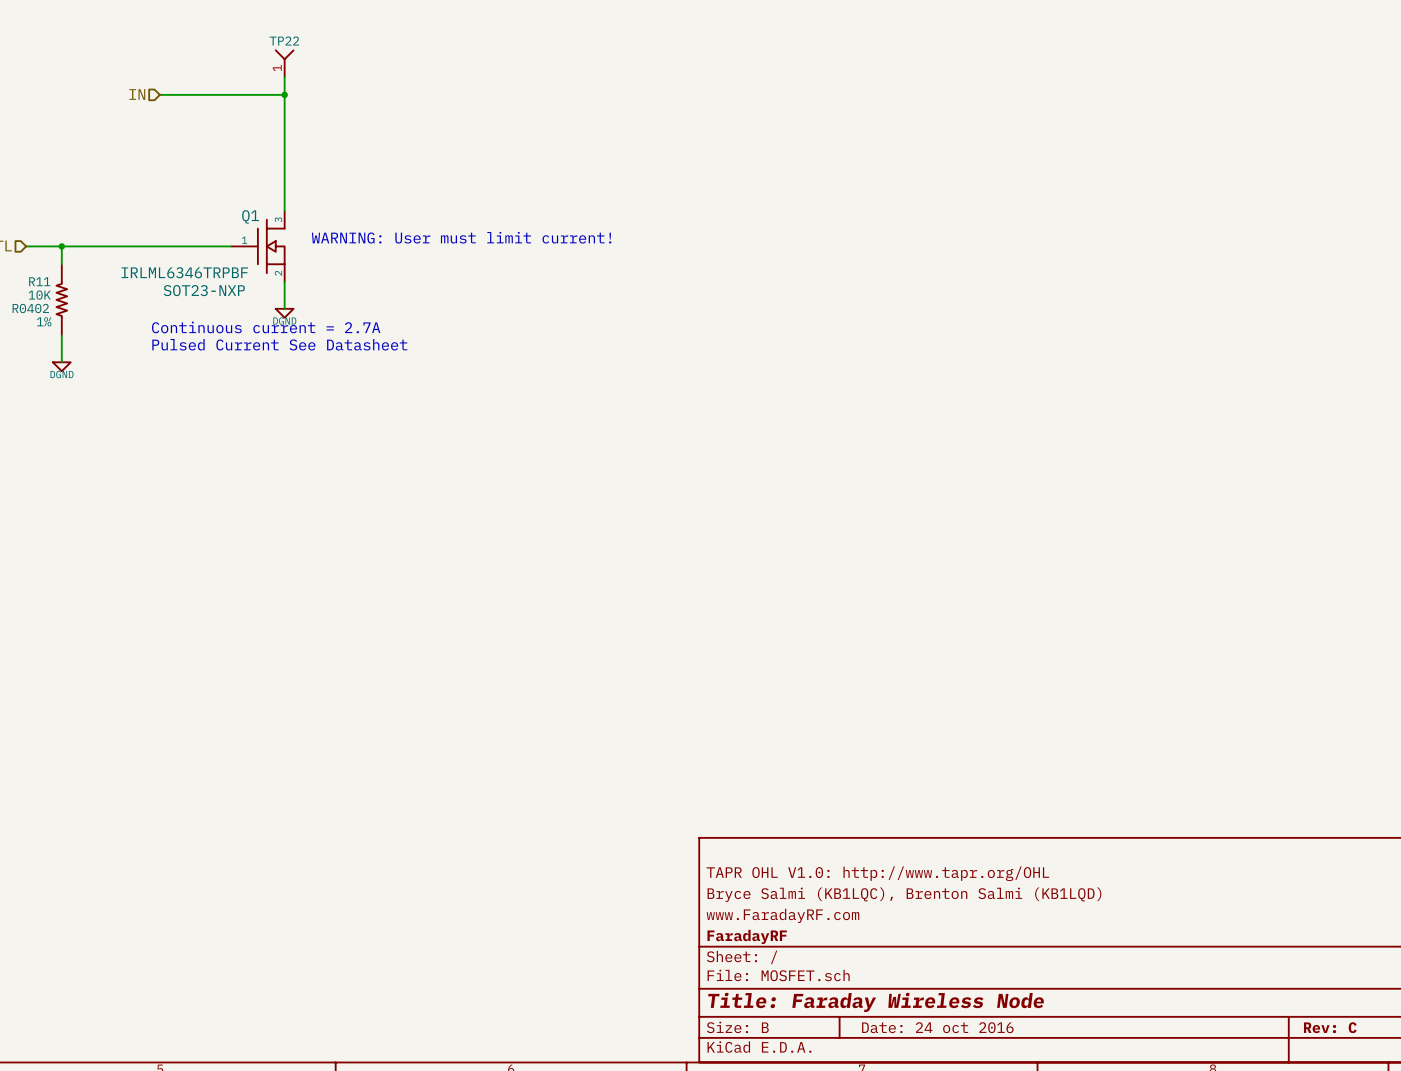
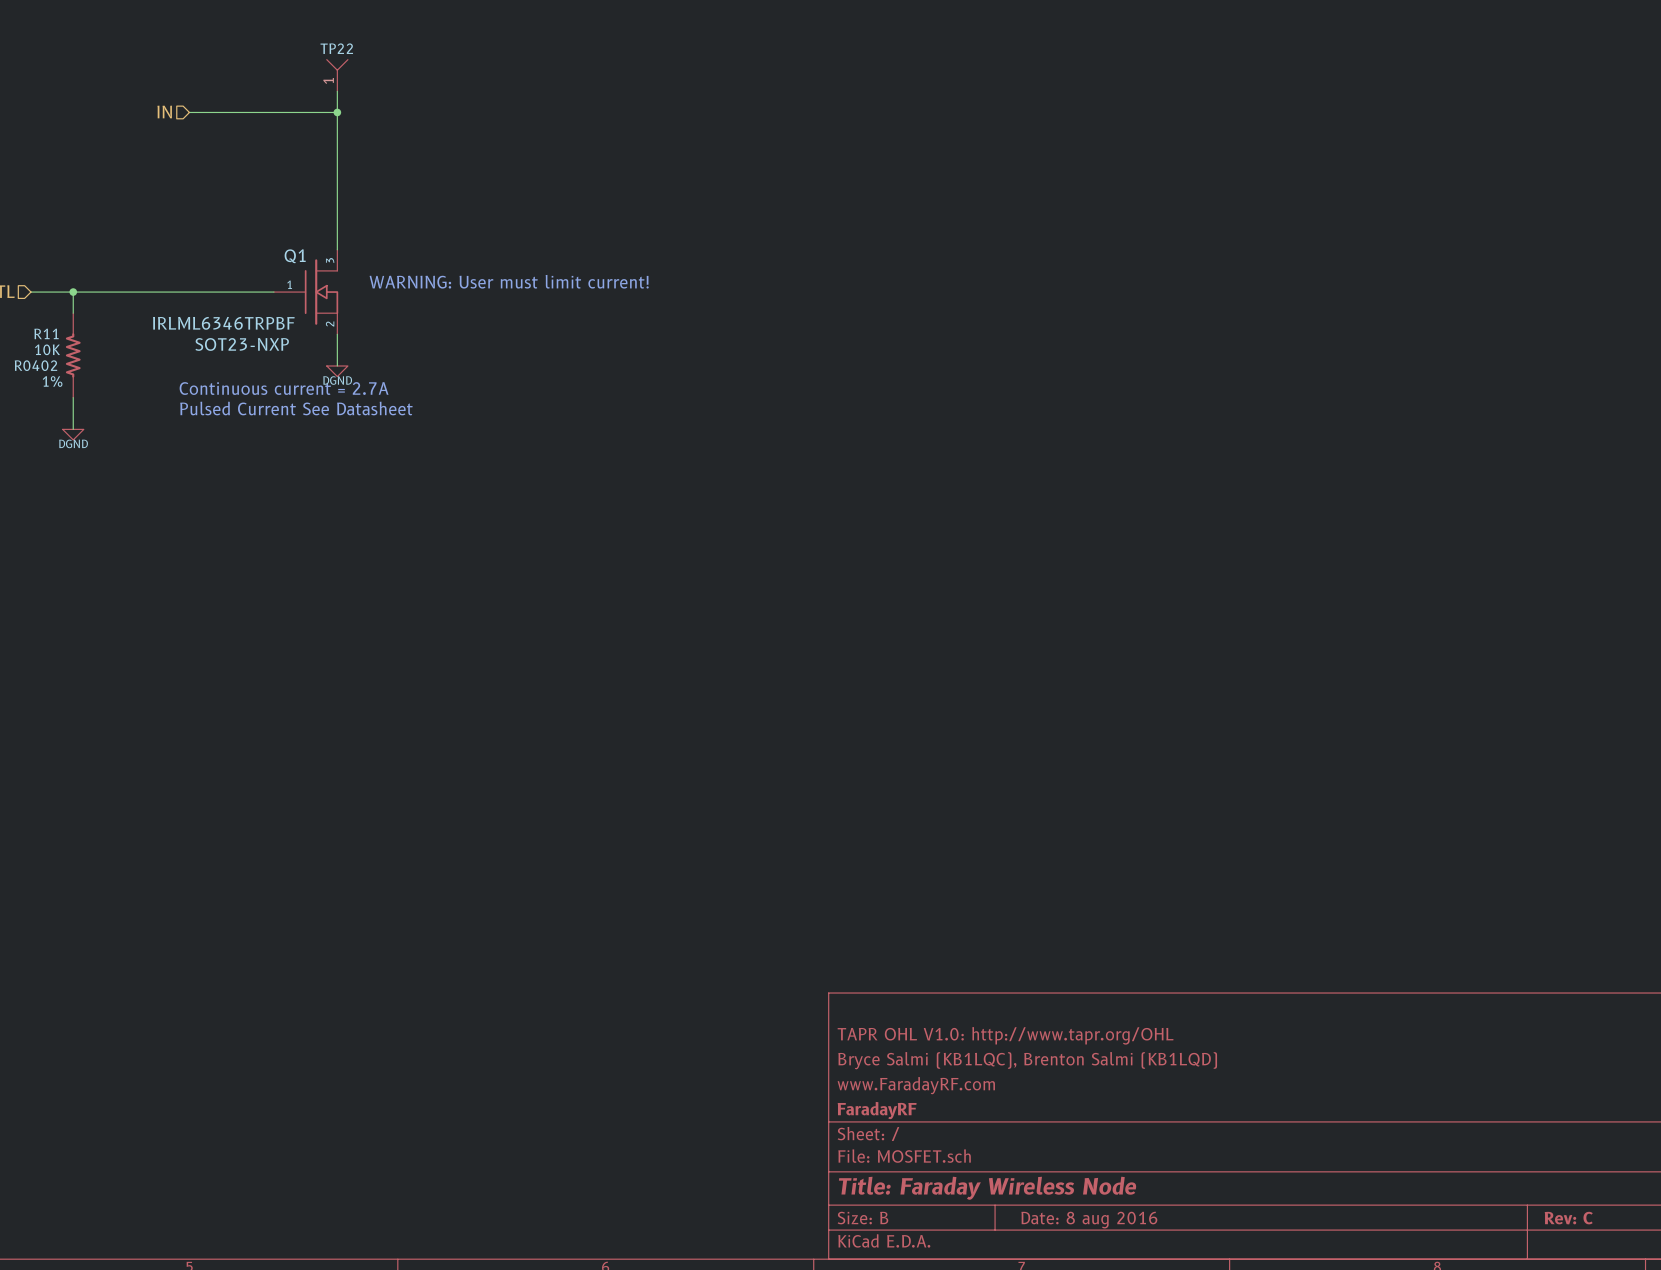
title block: Date: 24 oct 2016 (937, 1027) -> Date: 8 aug 2016 (1089, 1220)

